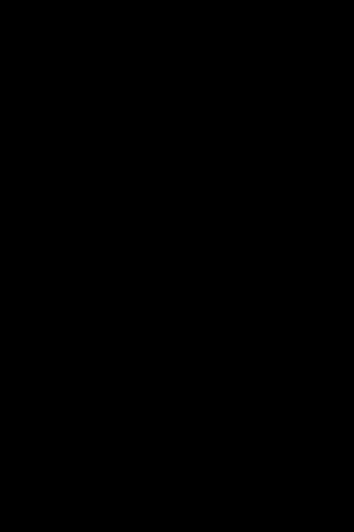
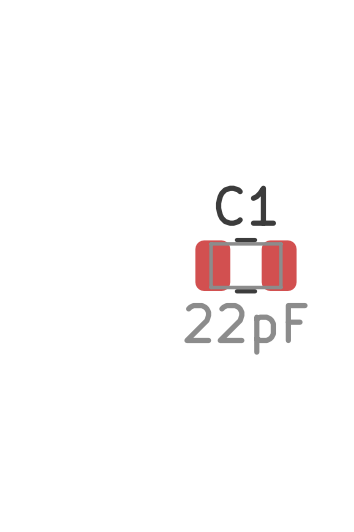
C1: none -> 22pF (245, 265)

